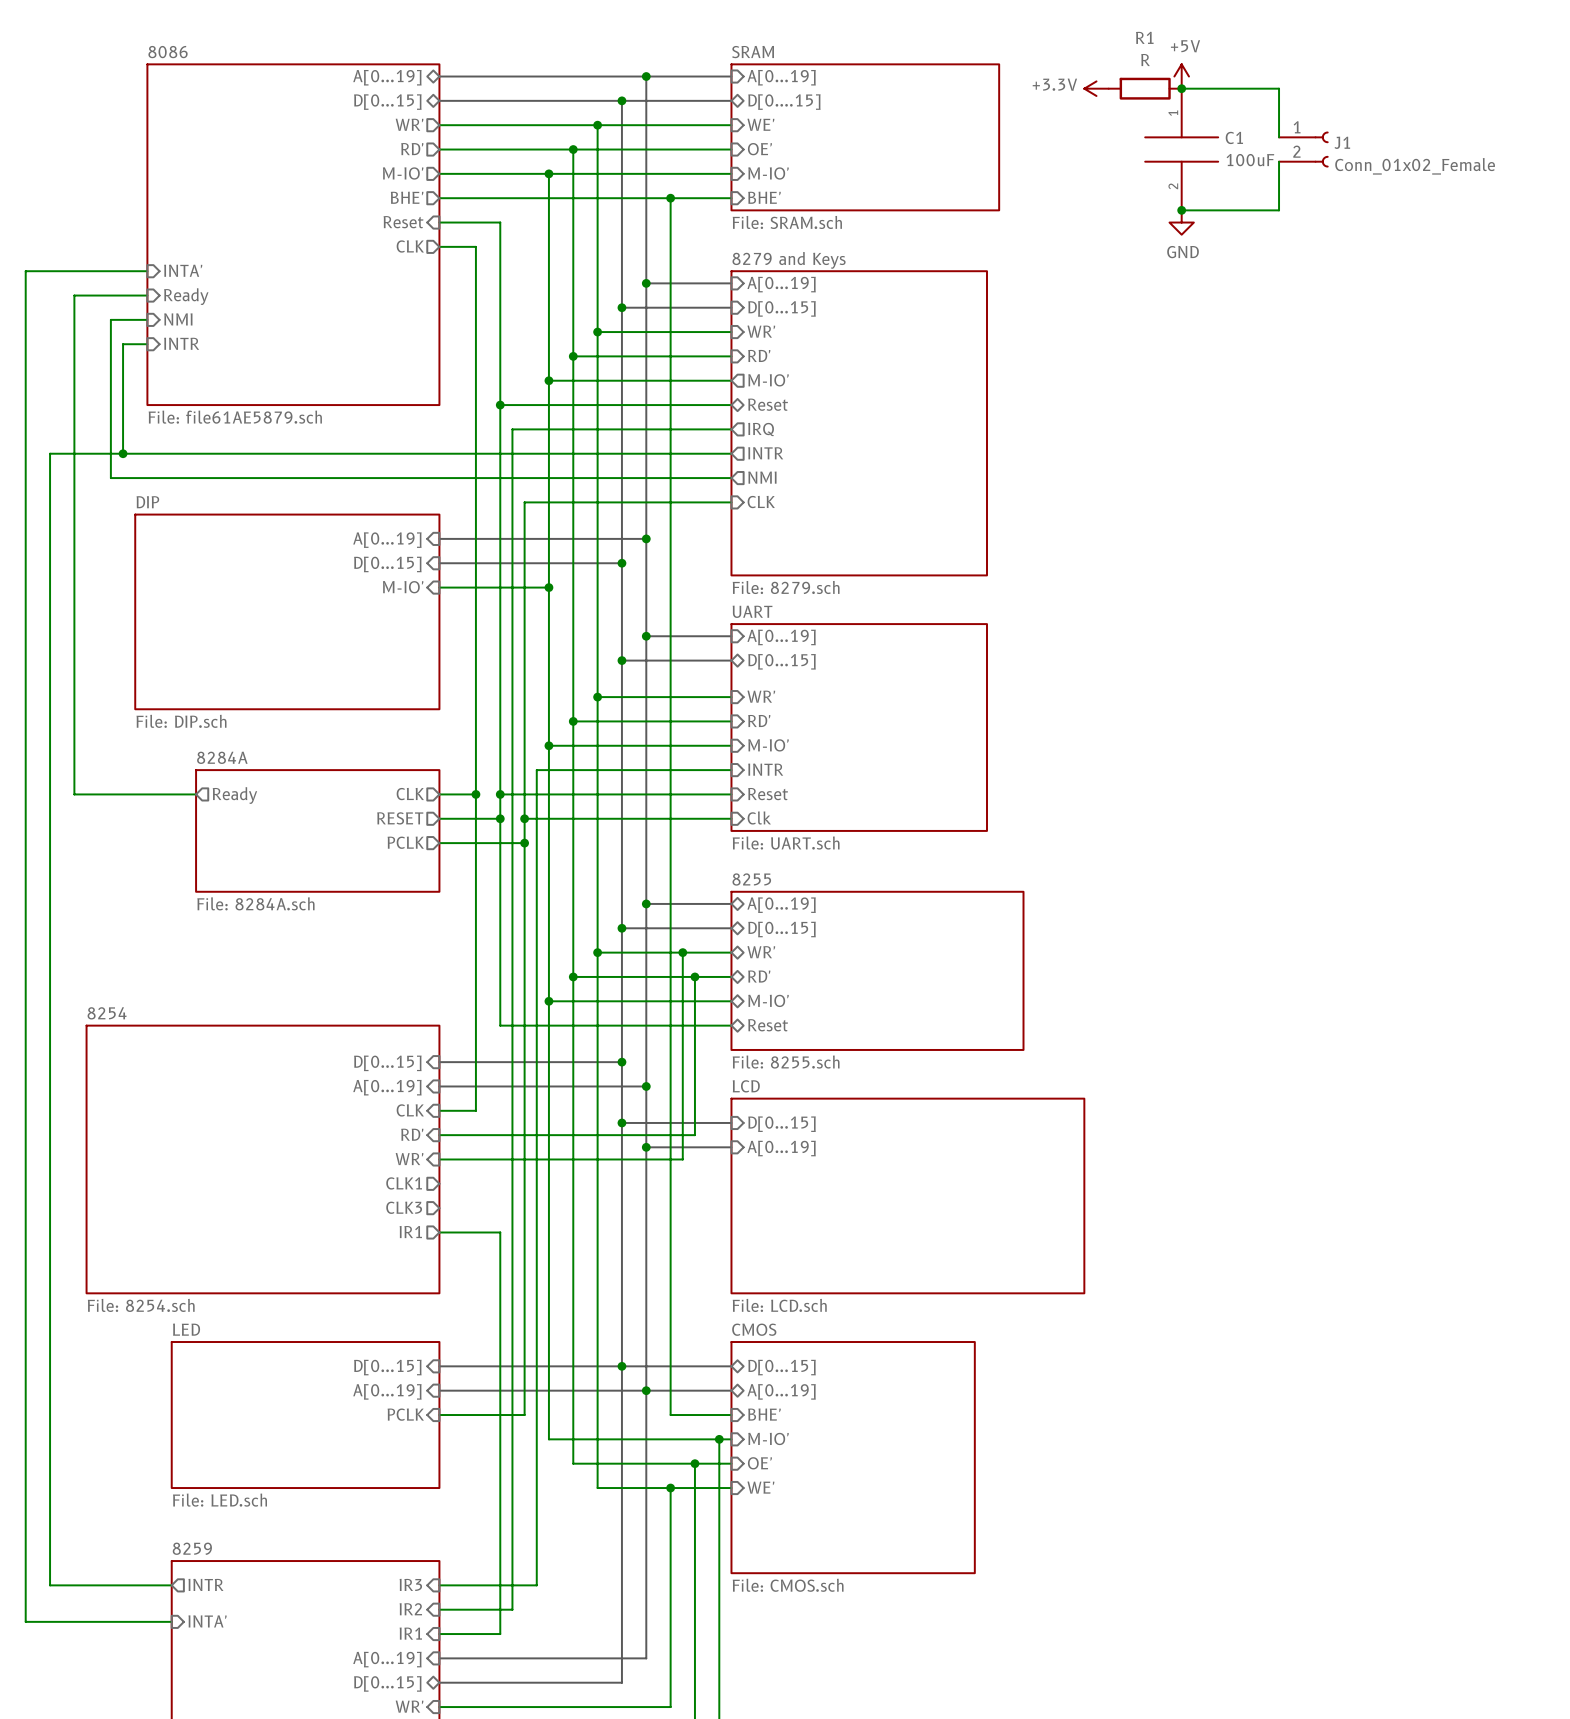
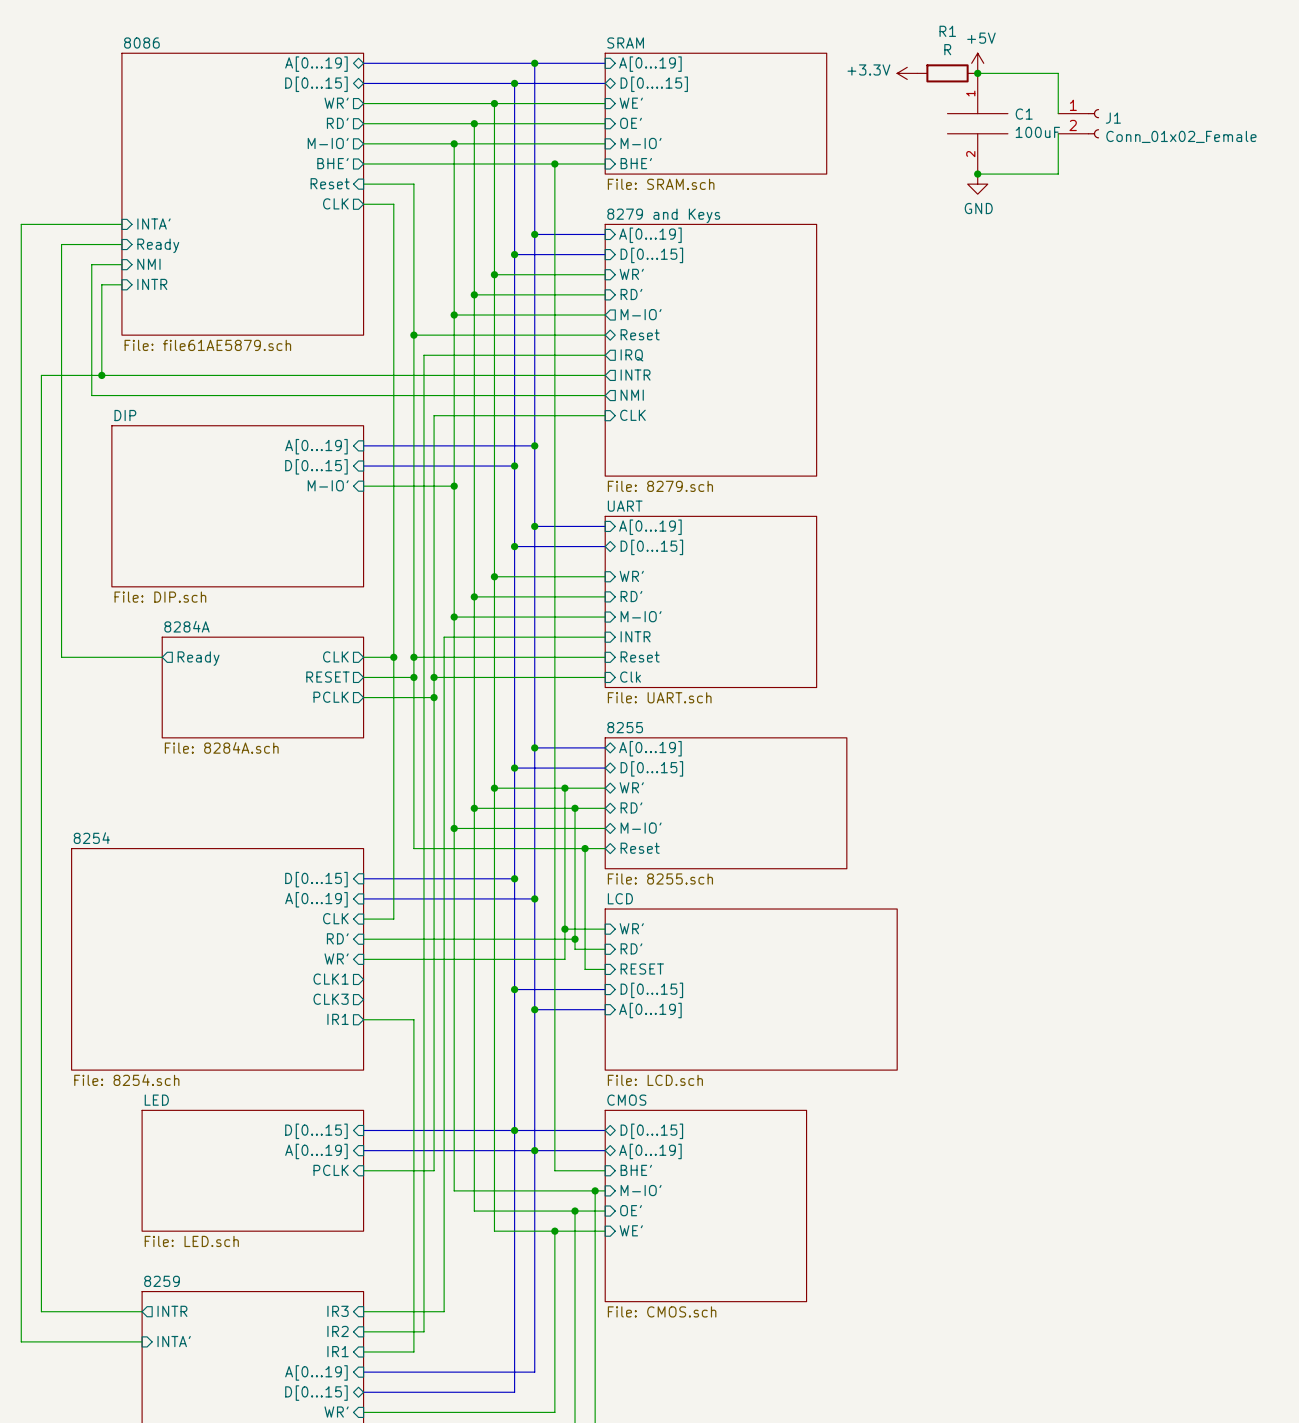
wire: none -> (585, 848) (585, 969) (605, 969)
junction: none -> (585, 848)
bus: (621, 1122) (731, 1122) -> (514, 989) (605, 989)
junction: (621, 1122) -> none
junction: none -> (564, 929)
sheet pin: D[0...15] (782, 1124) -> WR' (631, 928)
junction: none -> (575, 939)
bus: (646, 1147) (731, 1147) -> (534, 1009) (605, 1009)
junction: (646, 1147) -> none
sheet pin: A[0...19] (781, 1148) -> RD' (631, 948)
sheet pin: none -> RESET (642, 969)
junction: none -> (514, 989)
sheet pin: none -> D[0...15] (651, 990)
junction: none -> (534, 1009)
sheet pin: none -> A[0...19] (650, 1010)

